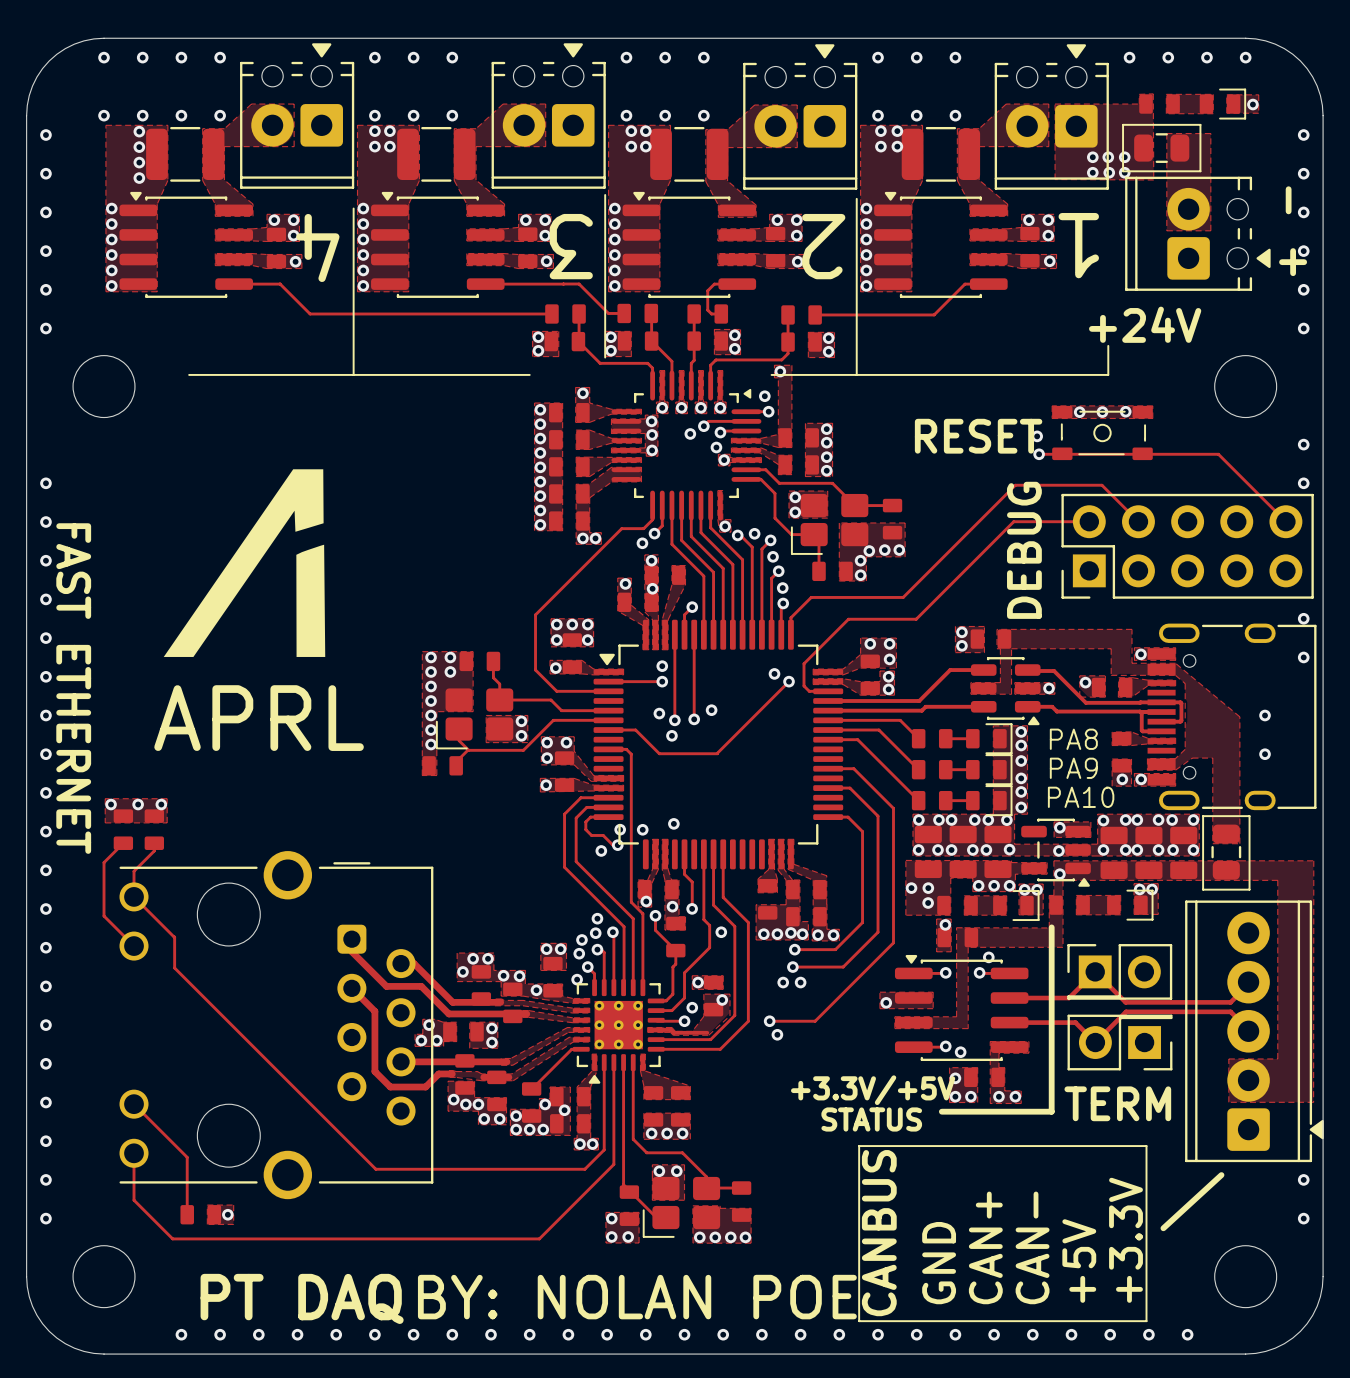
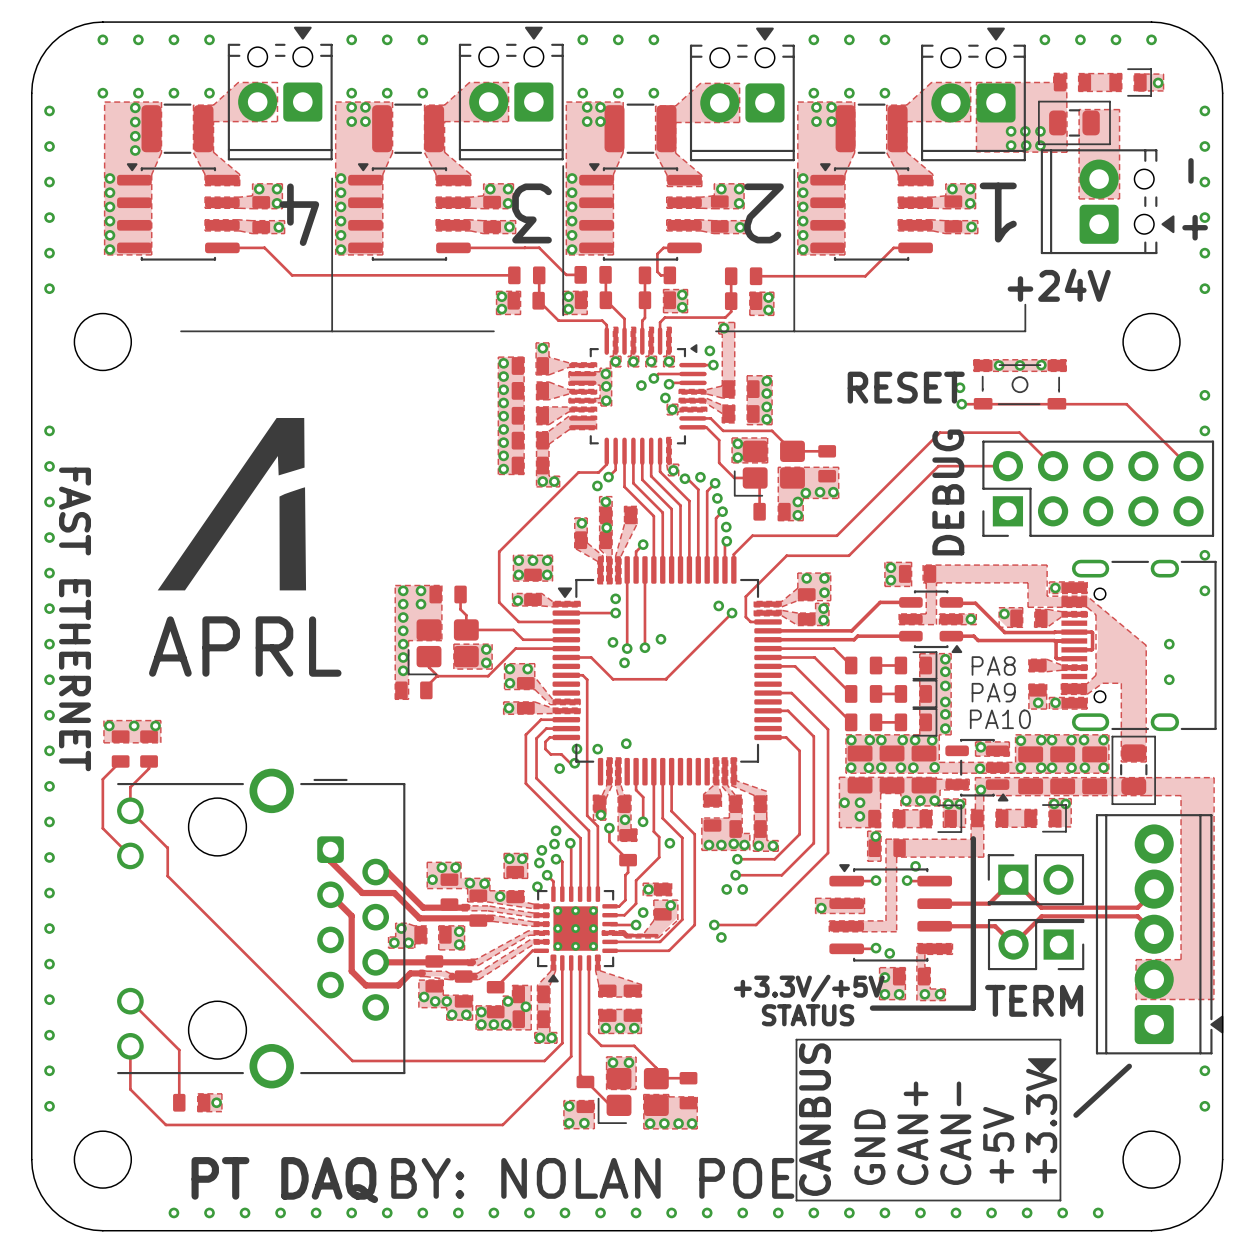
drawing: none -> [1027, 1058, 1057, 1074]

